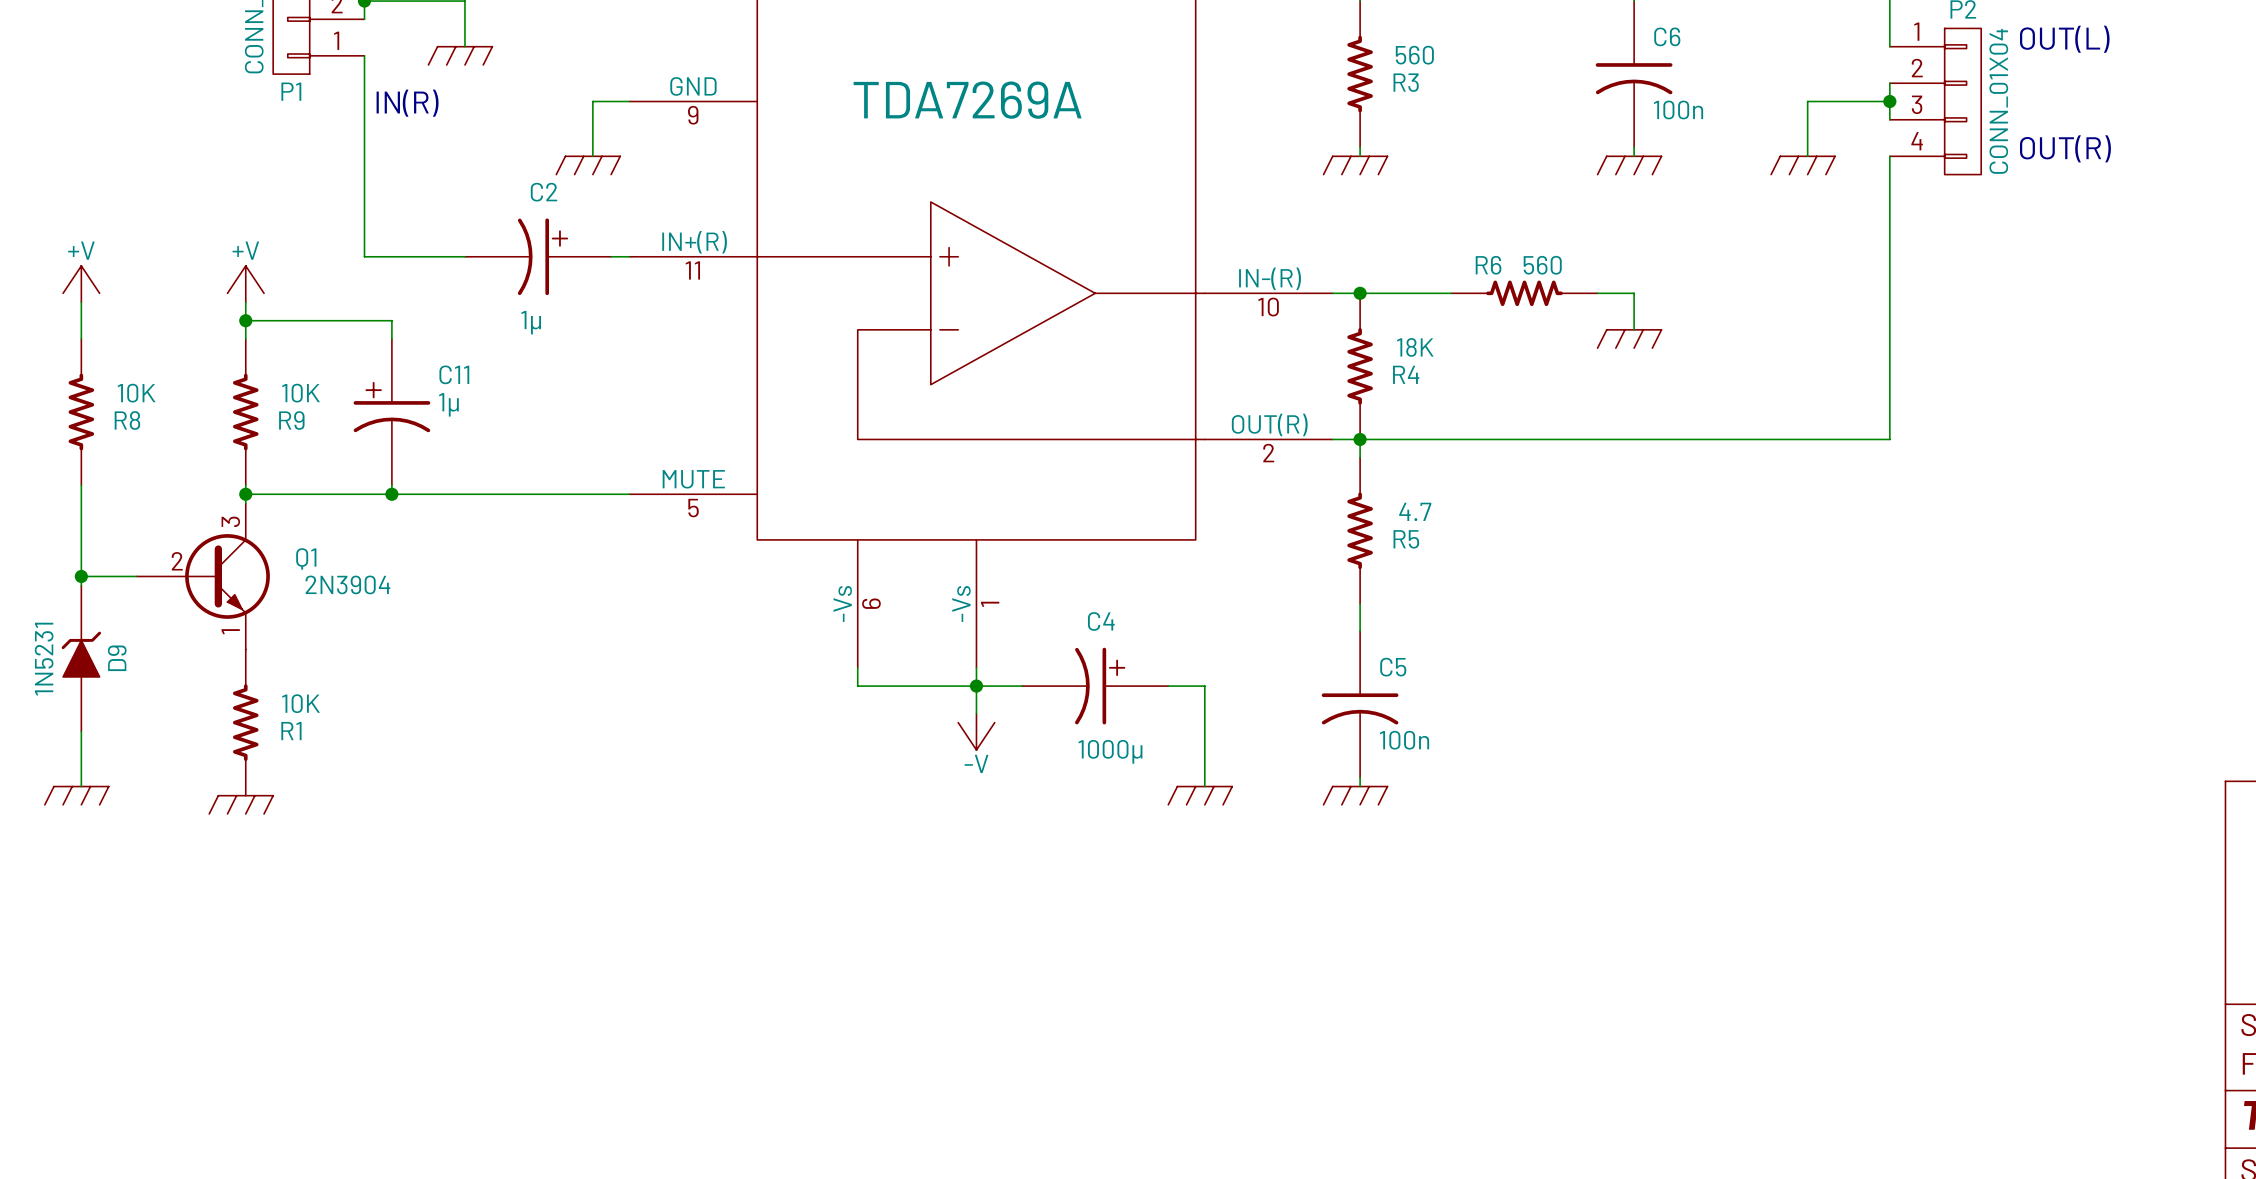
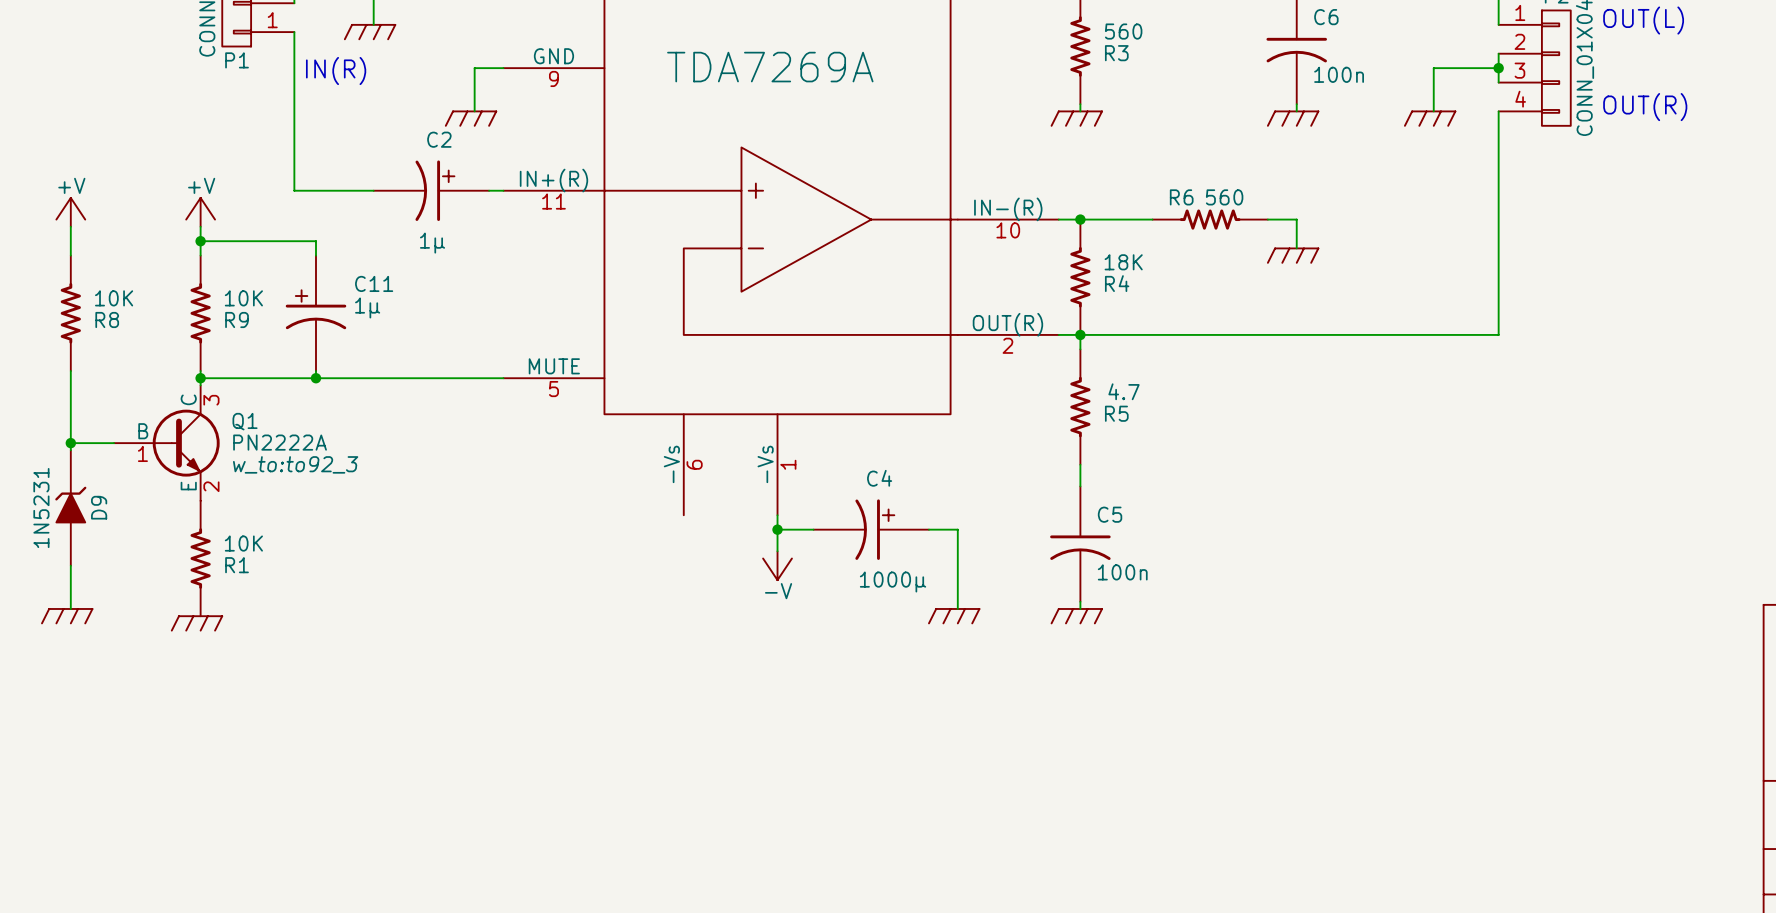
Q1 symbol: [136, 503, 270, 650] -> [114, 385, 220, 501]
Q1 value: 2N3904 (347, 584) -> PN2222A (280, 442)
Q1 text: none -> w_to:to92_3 (295, 464)
wire: (857, 667) (857, 686) (976, 686) -> none

